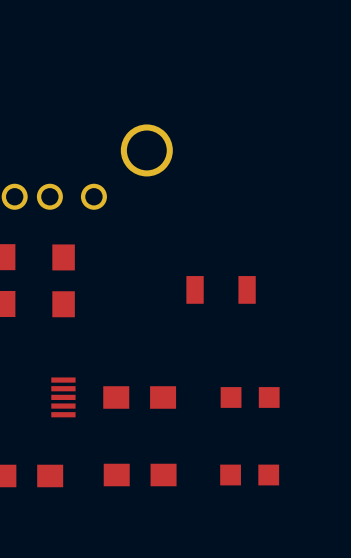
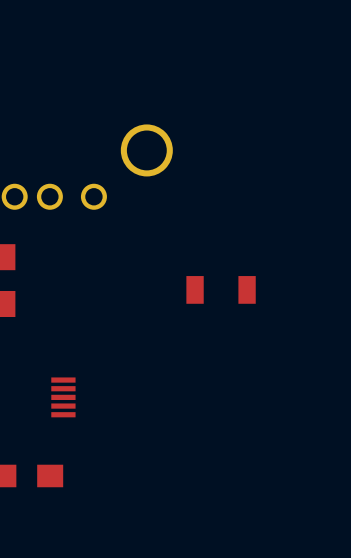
part: (63, 280) -> none
part: (139, 397) -> none
part: (250, 397) -> none
part: (140, 475) -> none
part: (249, 475) -> none

